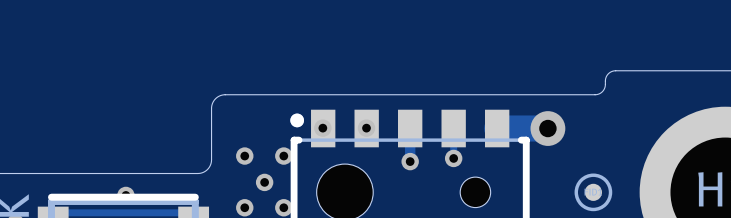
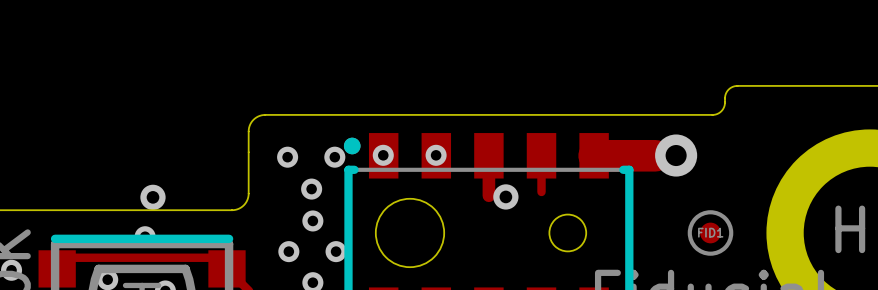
via position: (547, 128) -> (676, 155)
via: none -> (287, 157)
via: none -> (334, 157)
via: (244, 156) -> none
via: none -> (311, 189)
via: (283, 156) -> none
via: (453, 158) -> none
via position: (410, 161) -> (505, 196)
via: none -> (152, 197)

